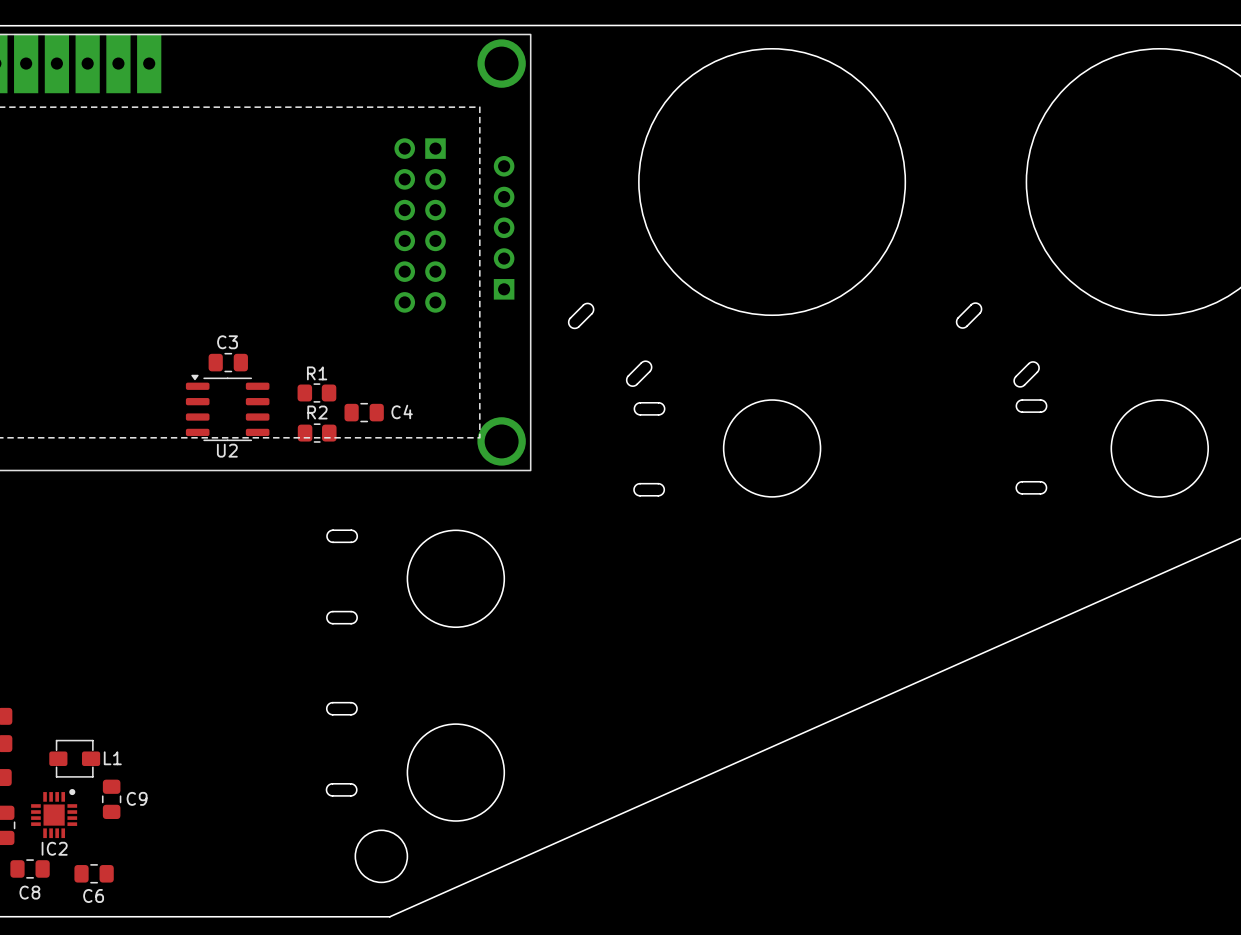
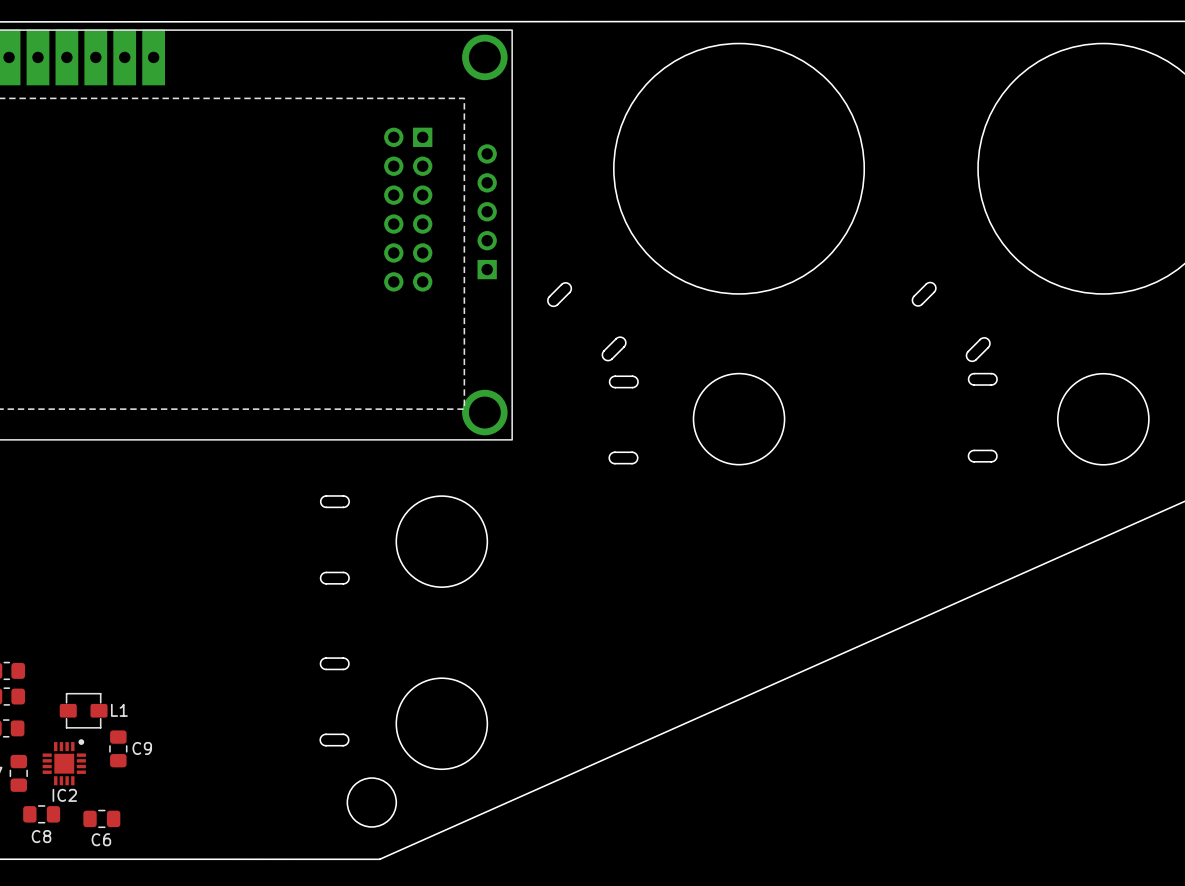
C3: (228, 362) -> none
R1: (316, 392) -> none
U2: (227, 407) -> none
C4: (364, 412) -> none
R2: (317, 433) -> none

